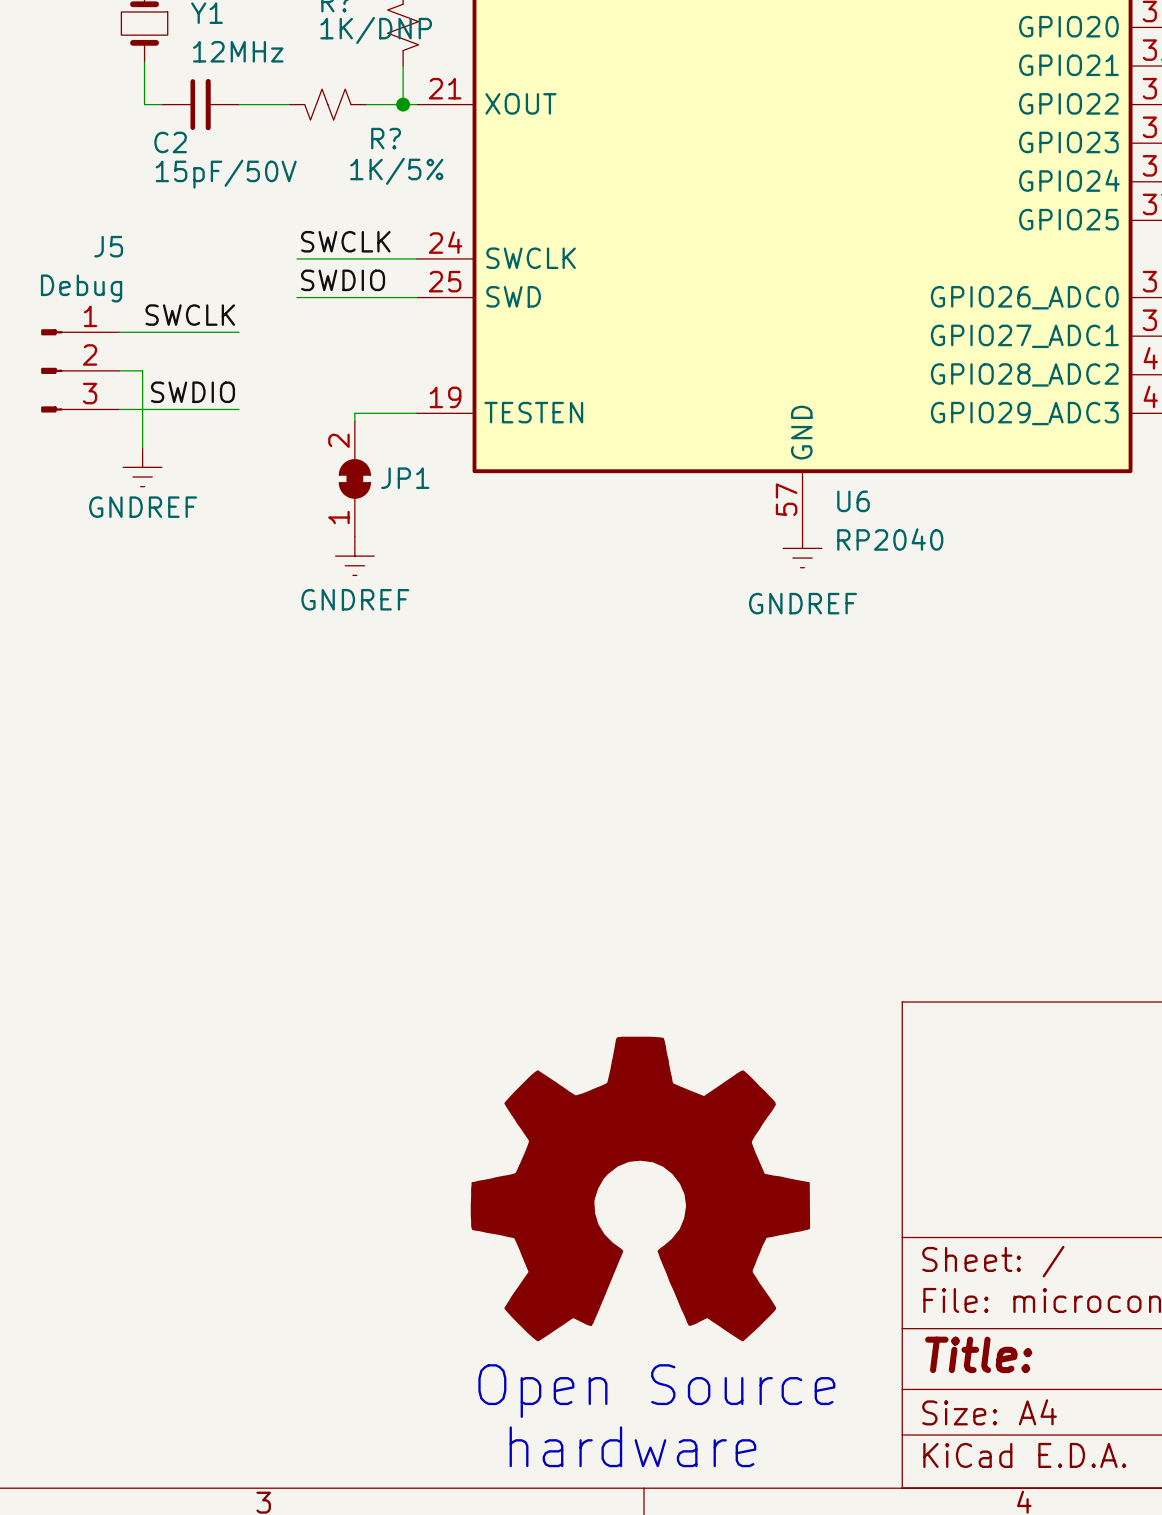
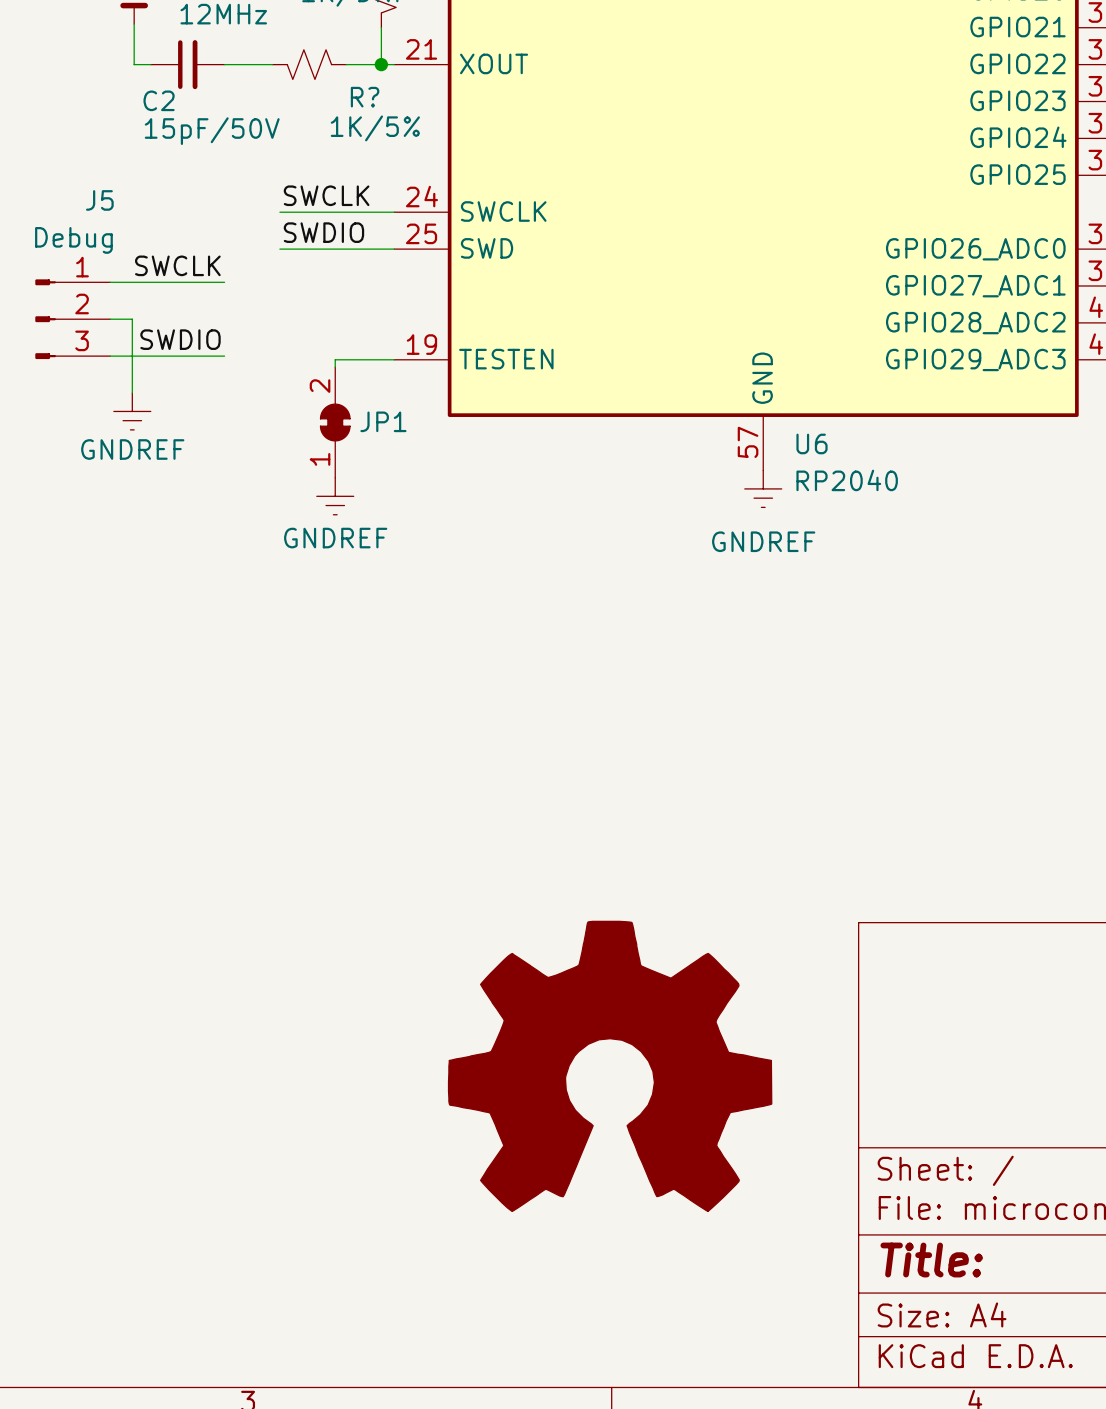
power symbol position: (640, 1189) -> (610, 1066)
text: Open Source (656, 1391) -> none
text: hardware (632, 1446) -> none

